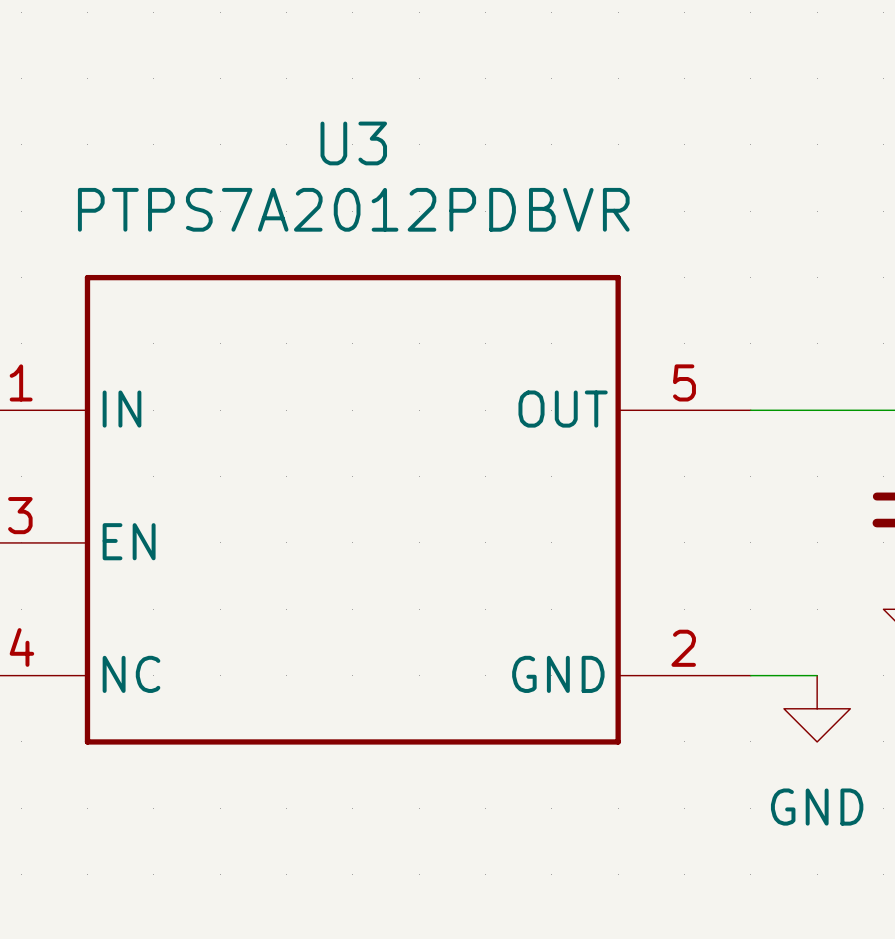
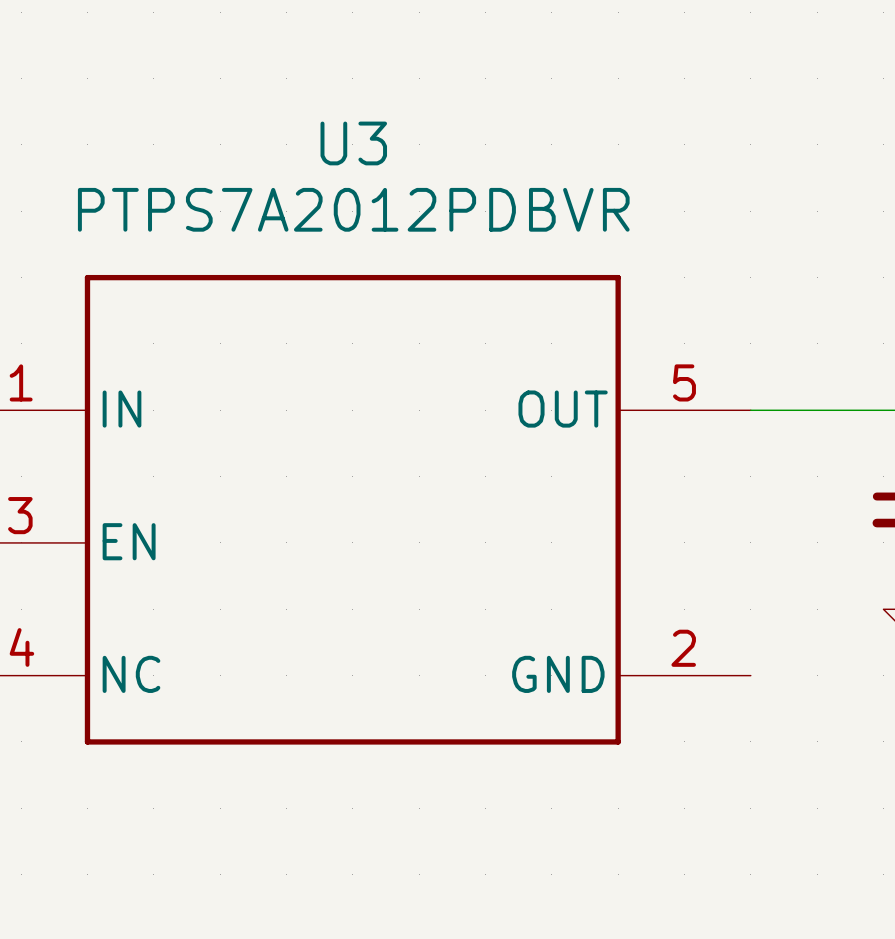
wire: (750, 675) (817, 675) -> none
power symbol: GND (817, 708) -> none

